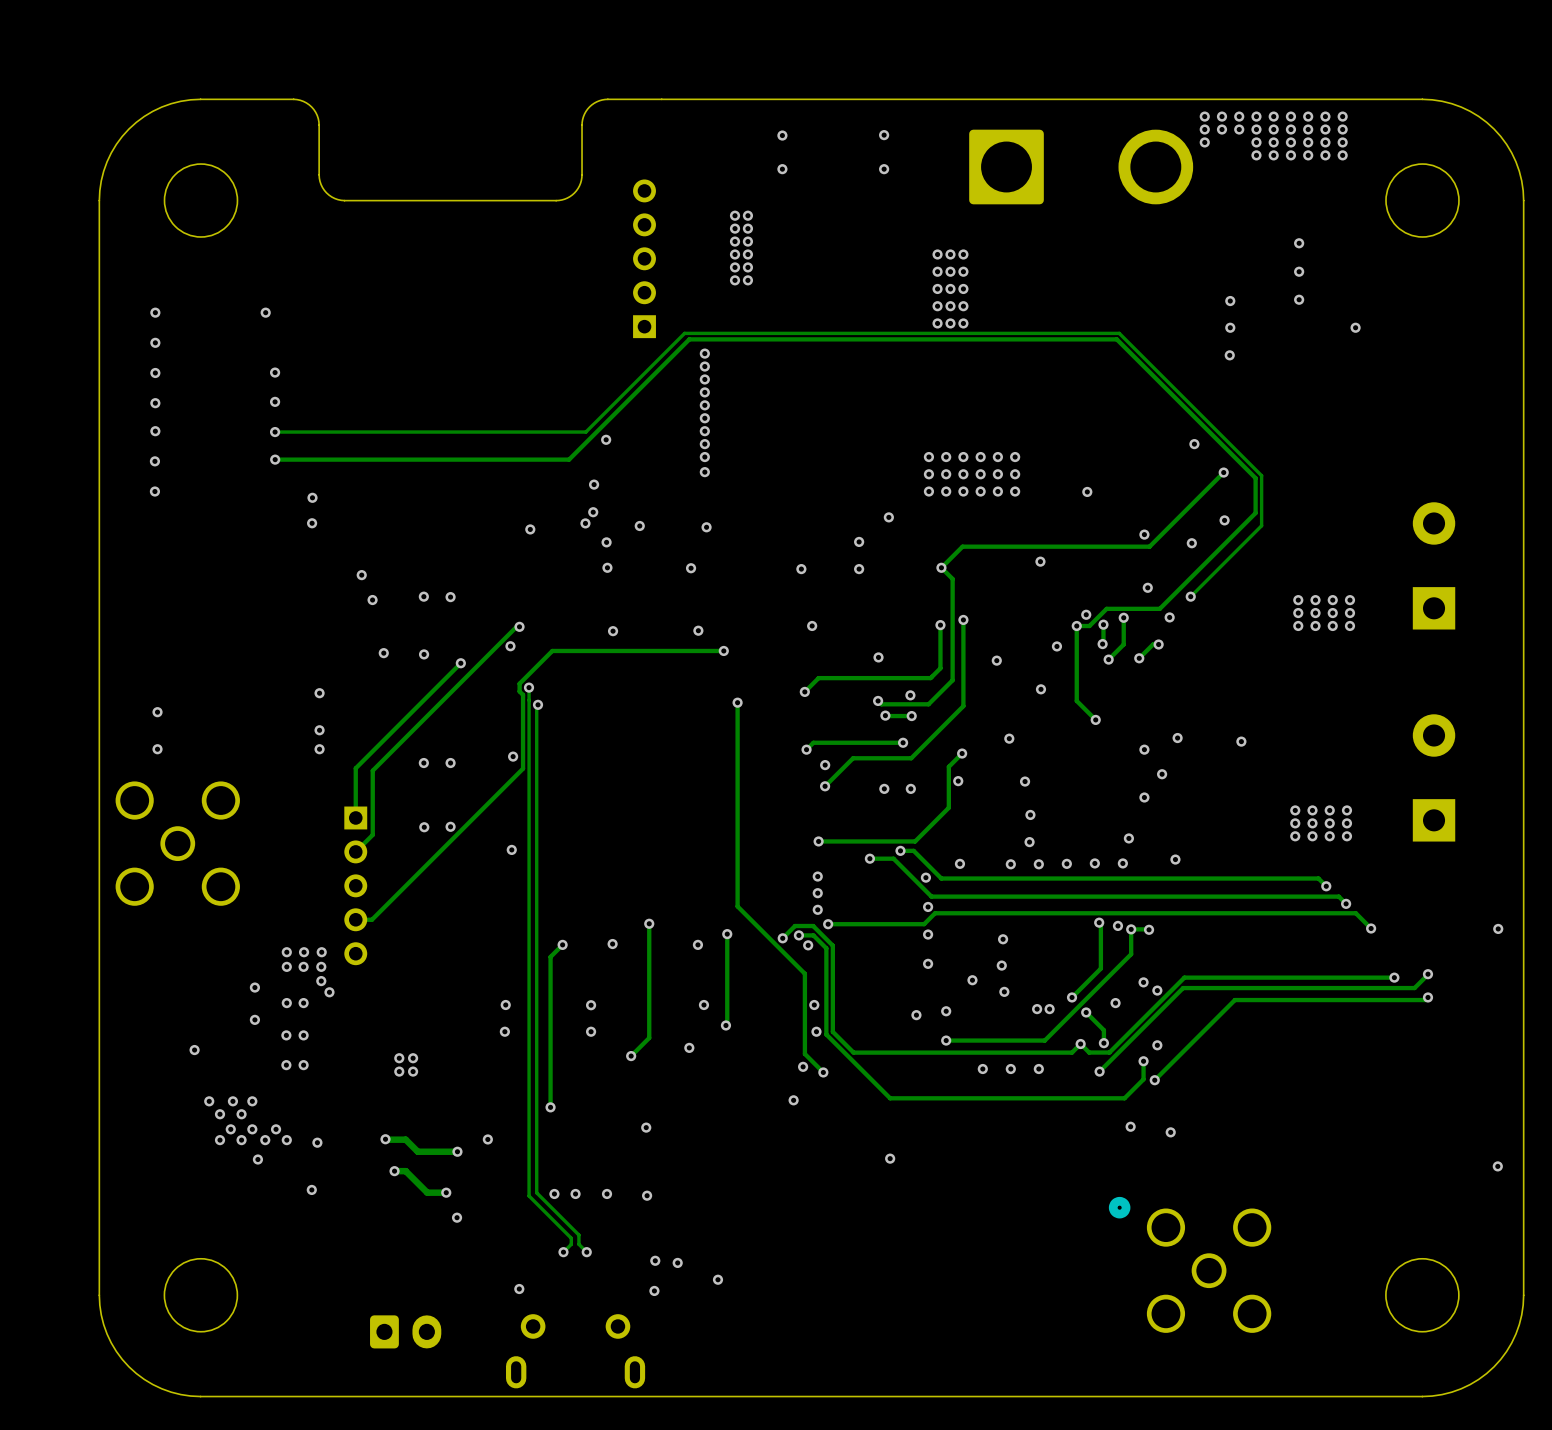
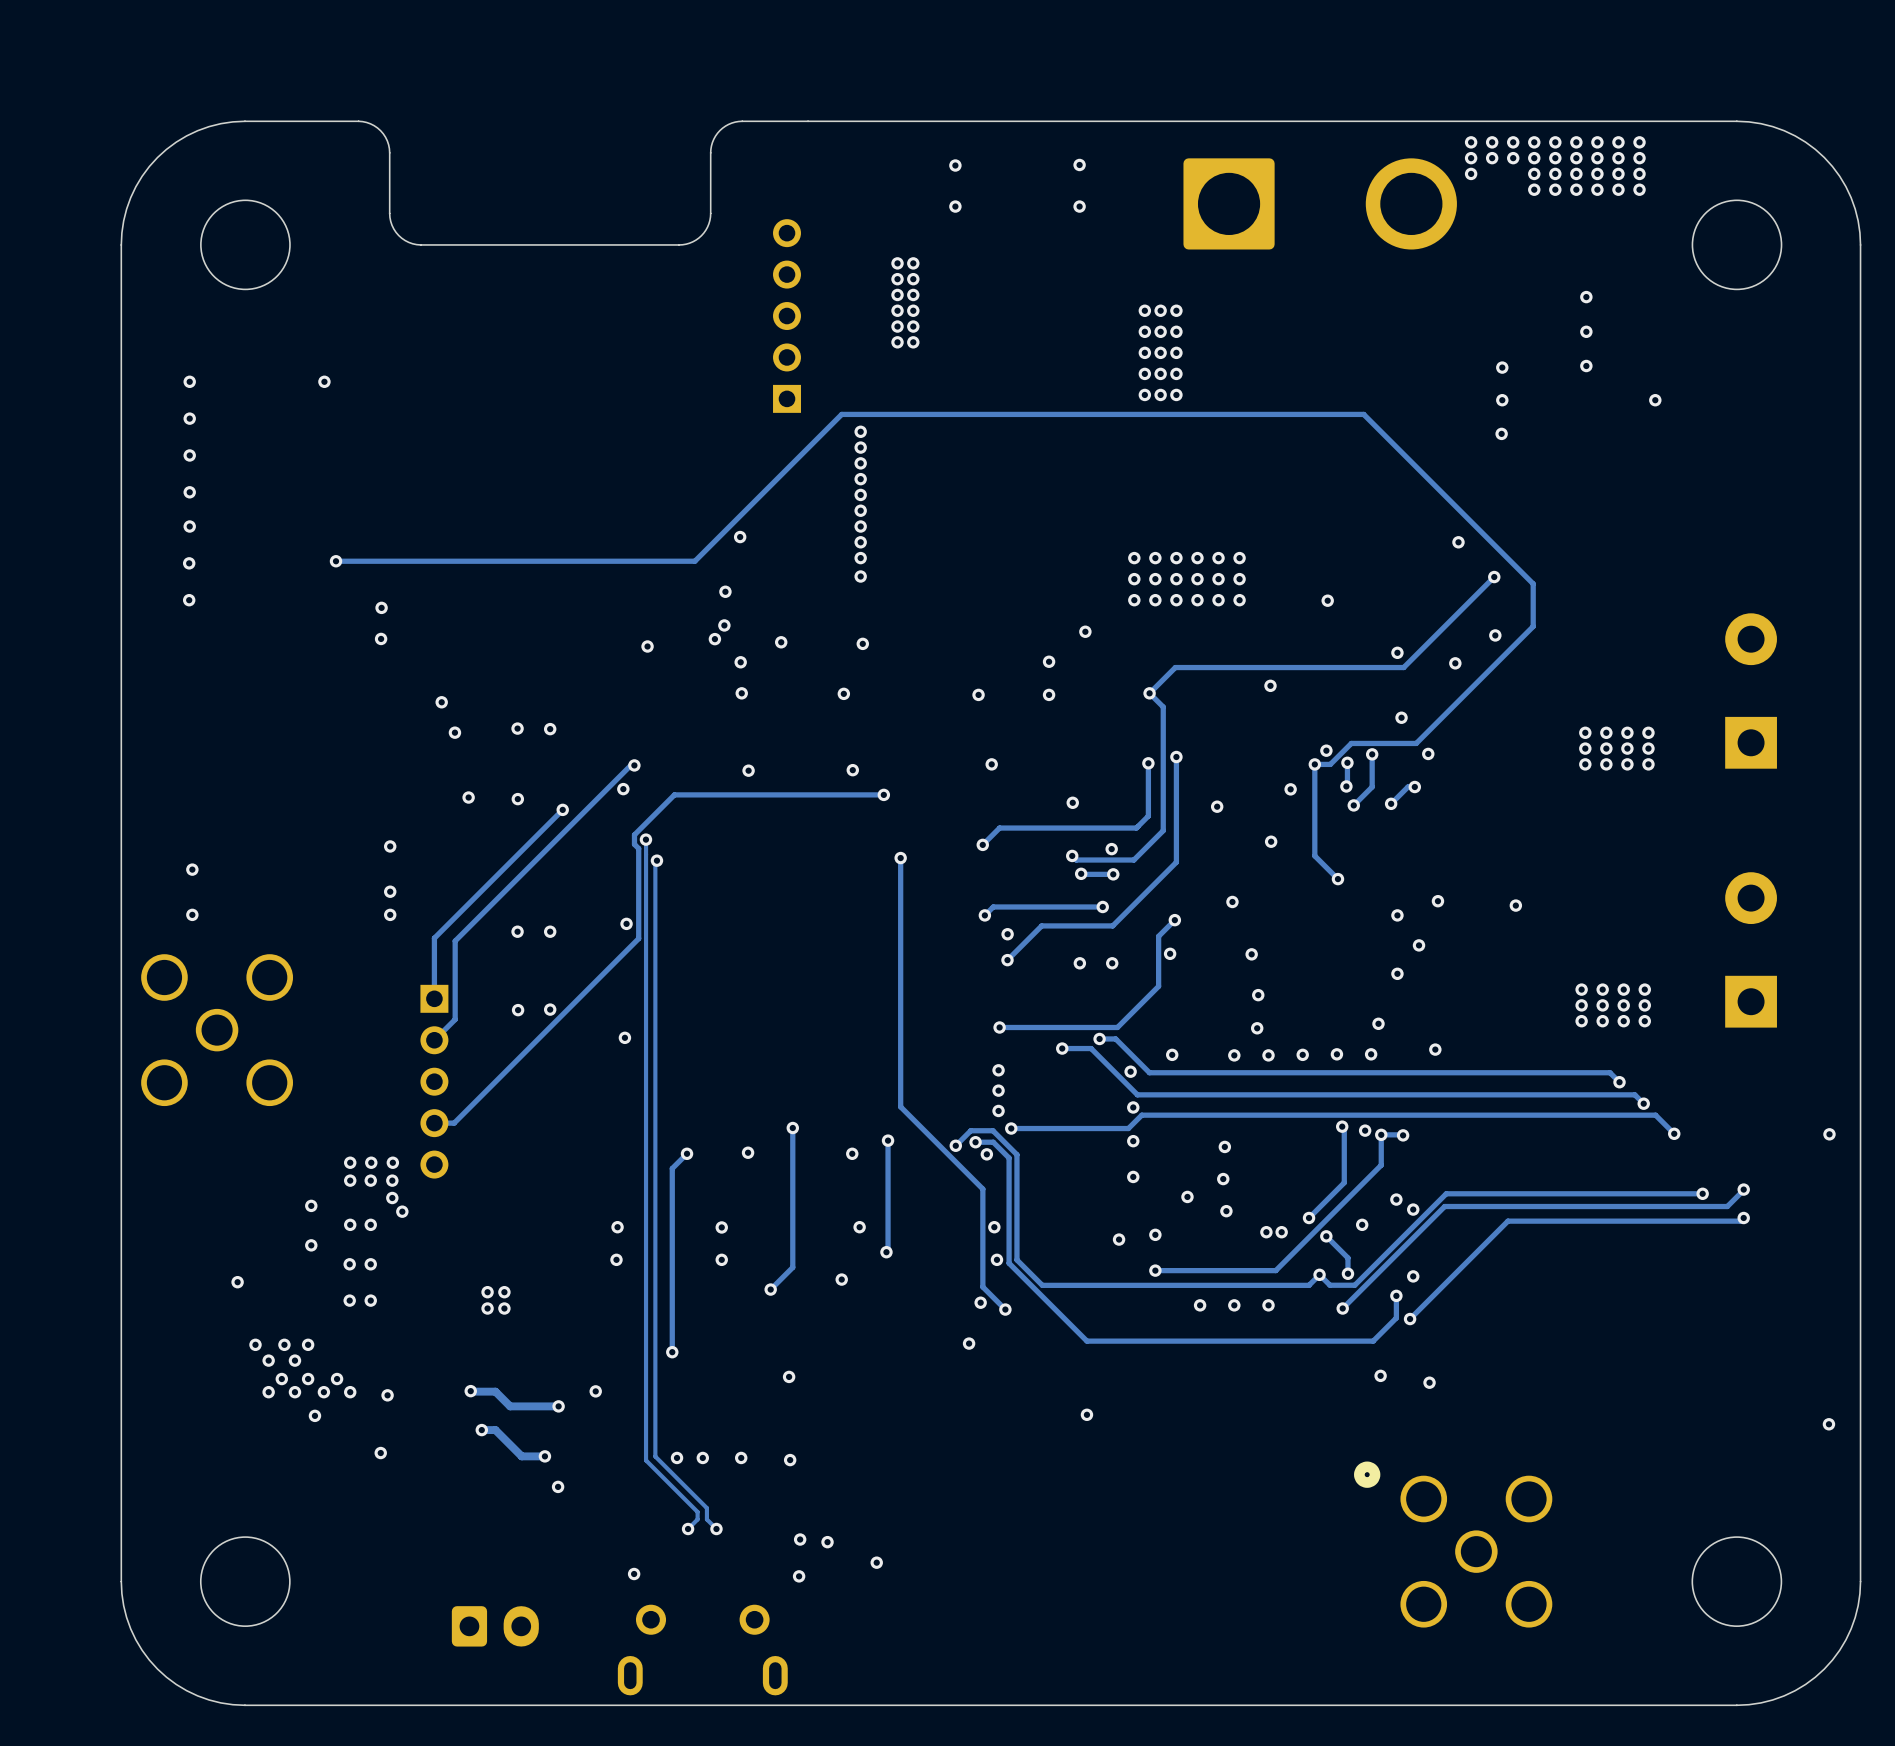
via: (275, 372) -> none
via: (275, 401) -> none
track: (275, 432) (585, 432) (684, 333) (1119, 333) (1261, 475) (1261, 525) (1190, 596) -> none
via: (275, 432) -> none
via: (1190, 596) -> none

